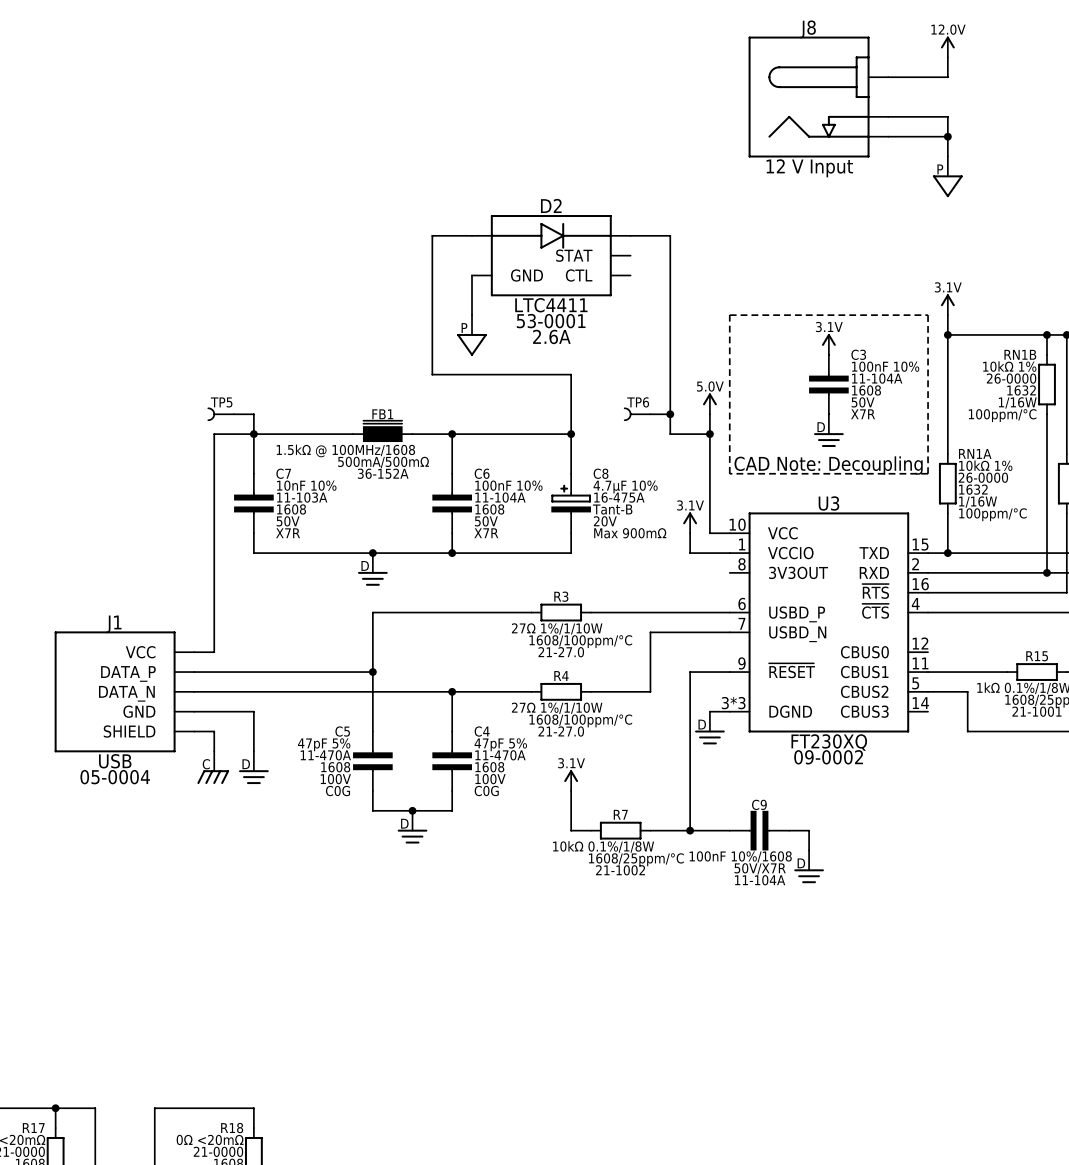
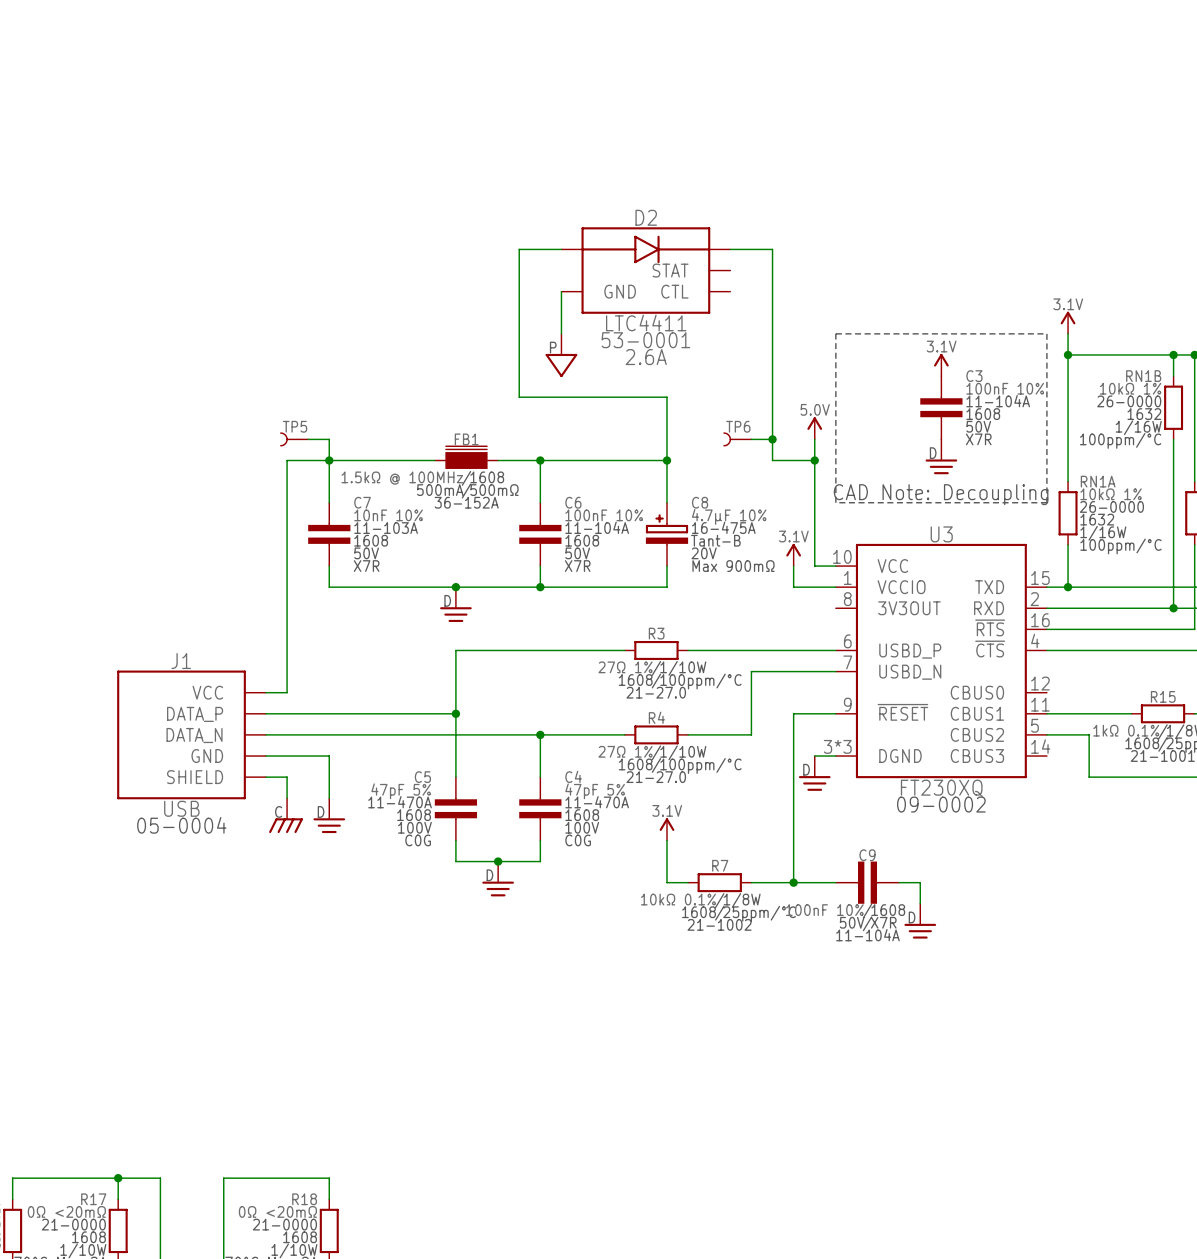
power symbol: 12.0V (947, 46) -> none
wire: (947, 57) (947, 77) (888, 77) -> none
J8: 12 V Input (818, 97) -> none
wire: (888, 116) (947, 116) (947, 156) -> none
wire: (888, 136) (947, 136) -> none
junction: (947, 136) -> none
power symbol: (947, 176) -> none

